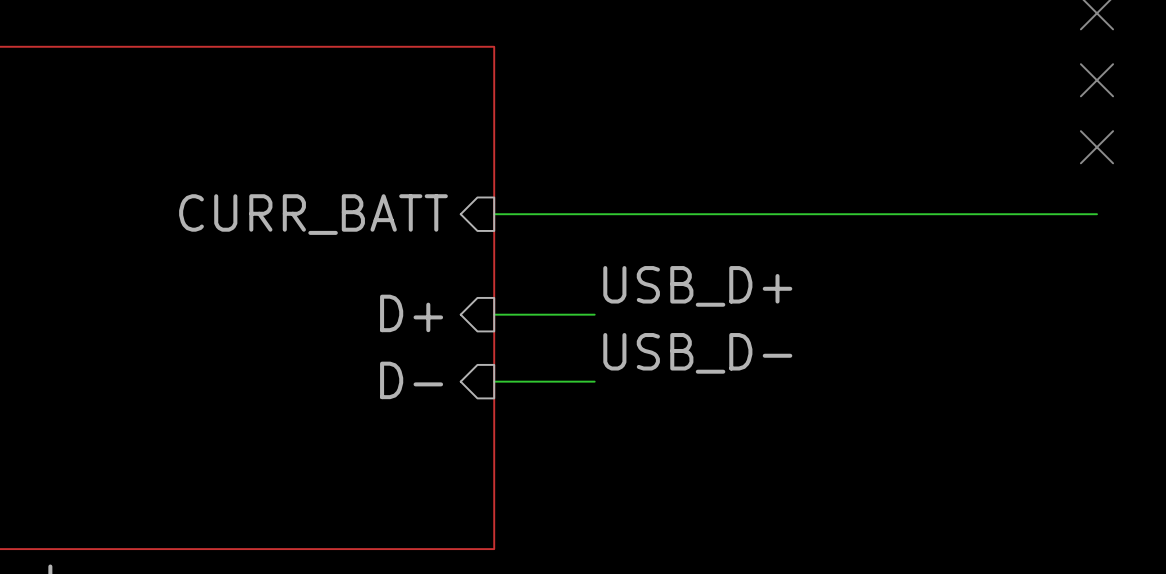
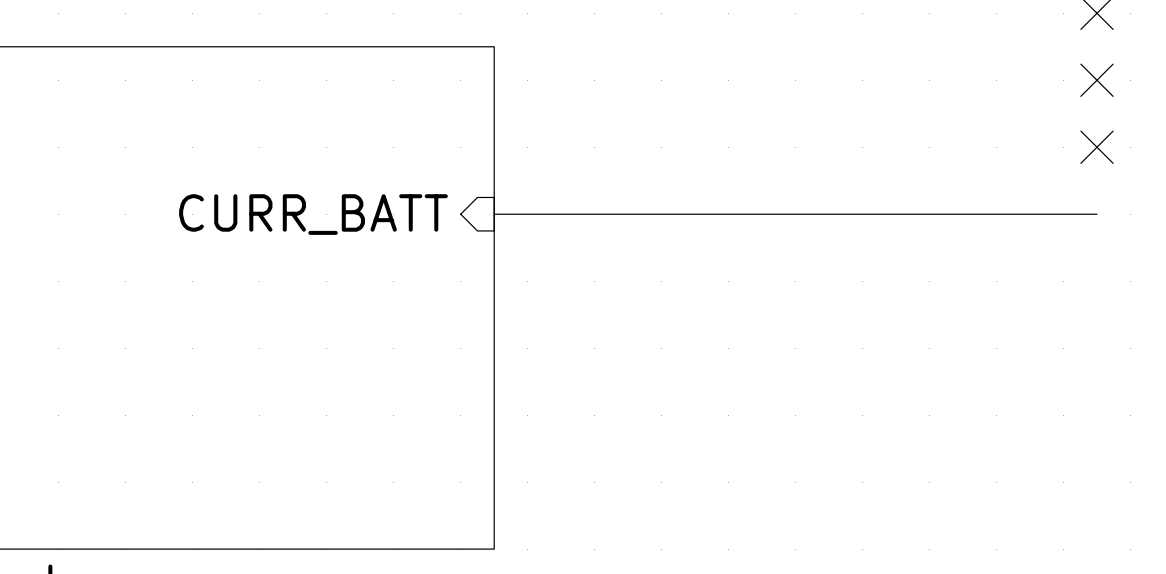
label: USB_D+ (697, 286) -> none
sheet pin: D+ (411, 313) -> none
wire: (494, 314) (594, 314) -> none
label: USB_D- (697, 353) -> none
sheet pin: D- (411, 380) -> none
wire: (494, 381) (594, 381) -> none

